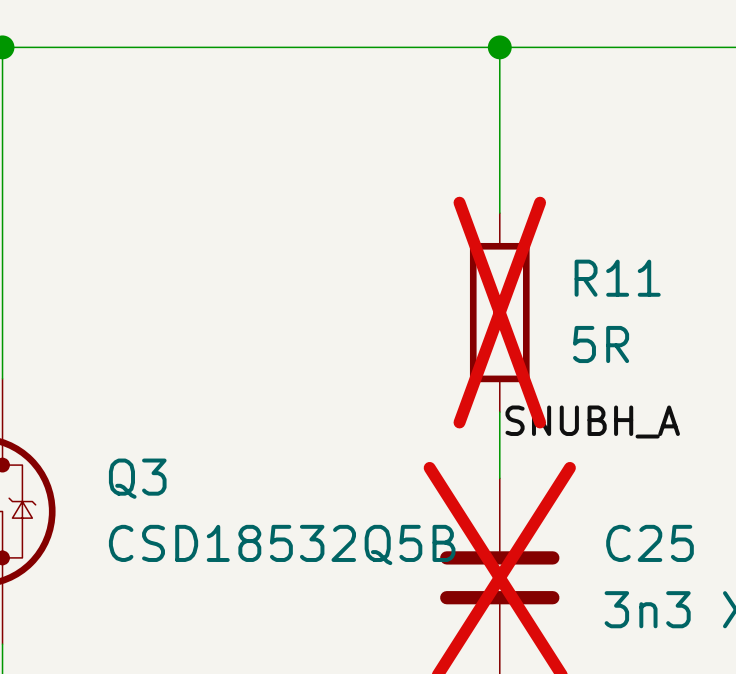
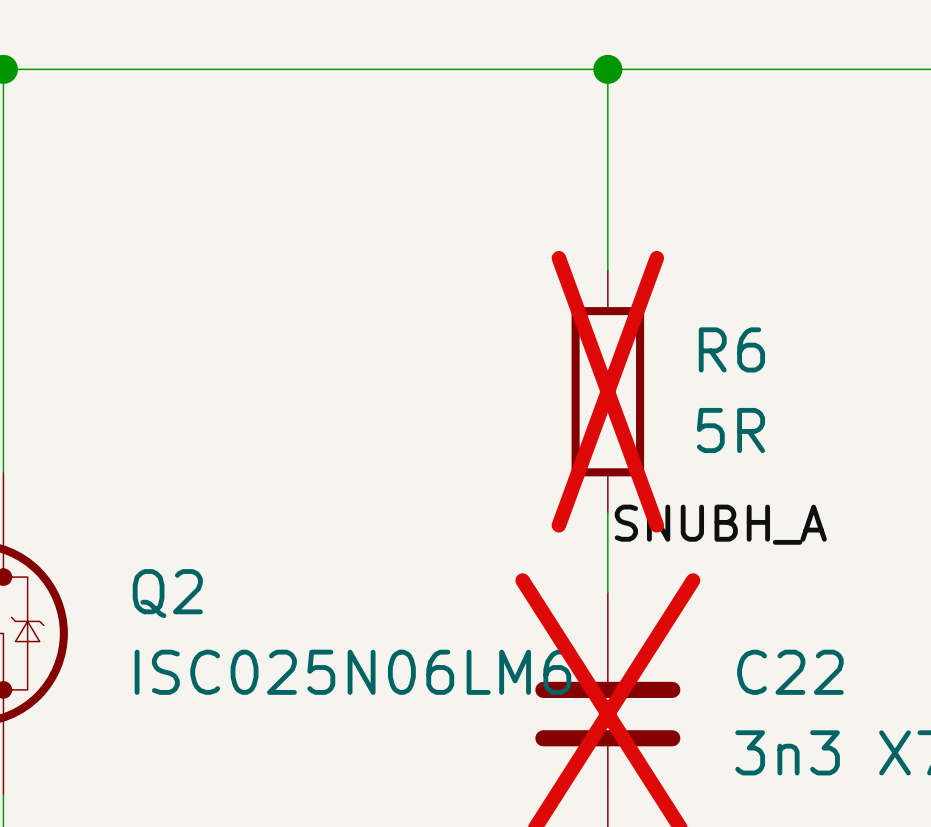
R11 name: R11 (617, 278) -> R6 (731, 349)
Q3 name: Q3 (137, 478) -> Q2 (167, 593)
C25 name: C25 (650, 543) -> C22 (790, 672)
Q3 value: CSD18532Q5B (282, 544) -> ISC025N06LM6 (352, 672)

